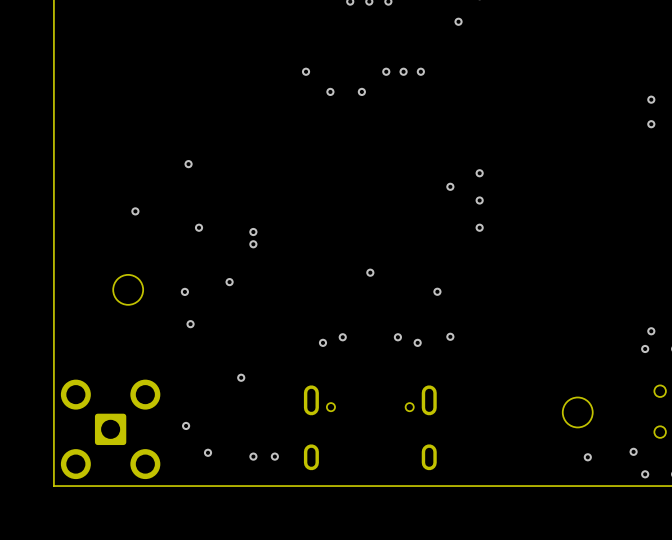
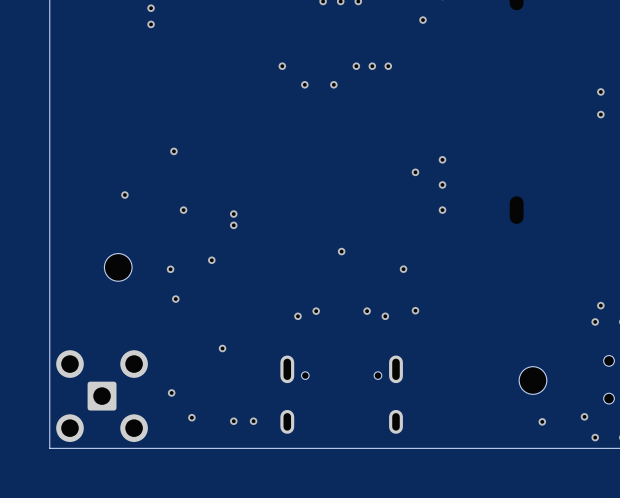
via: none -> (151, 8)
via: none -> (151, 24)

